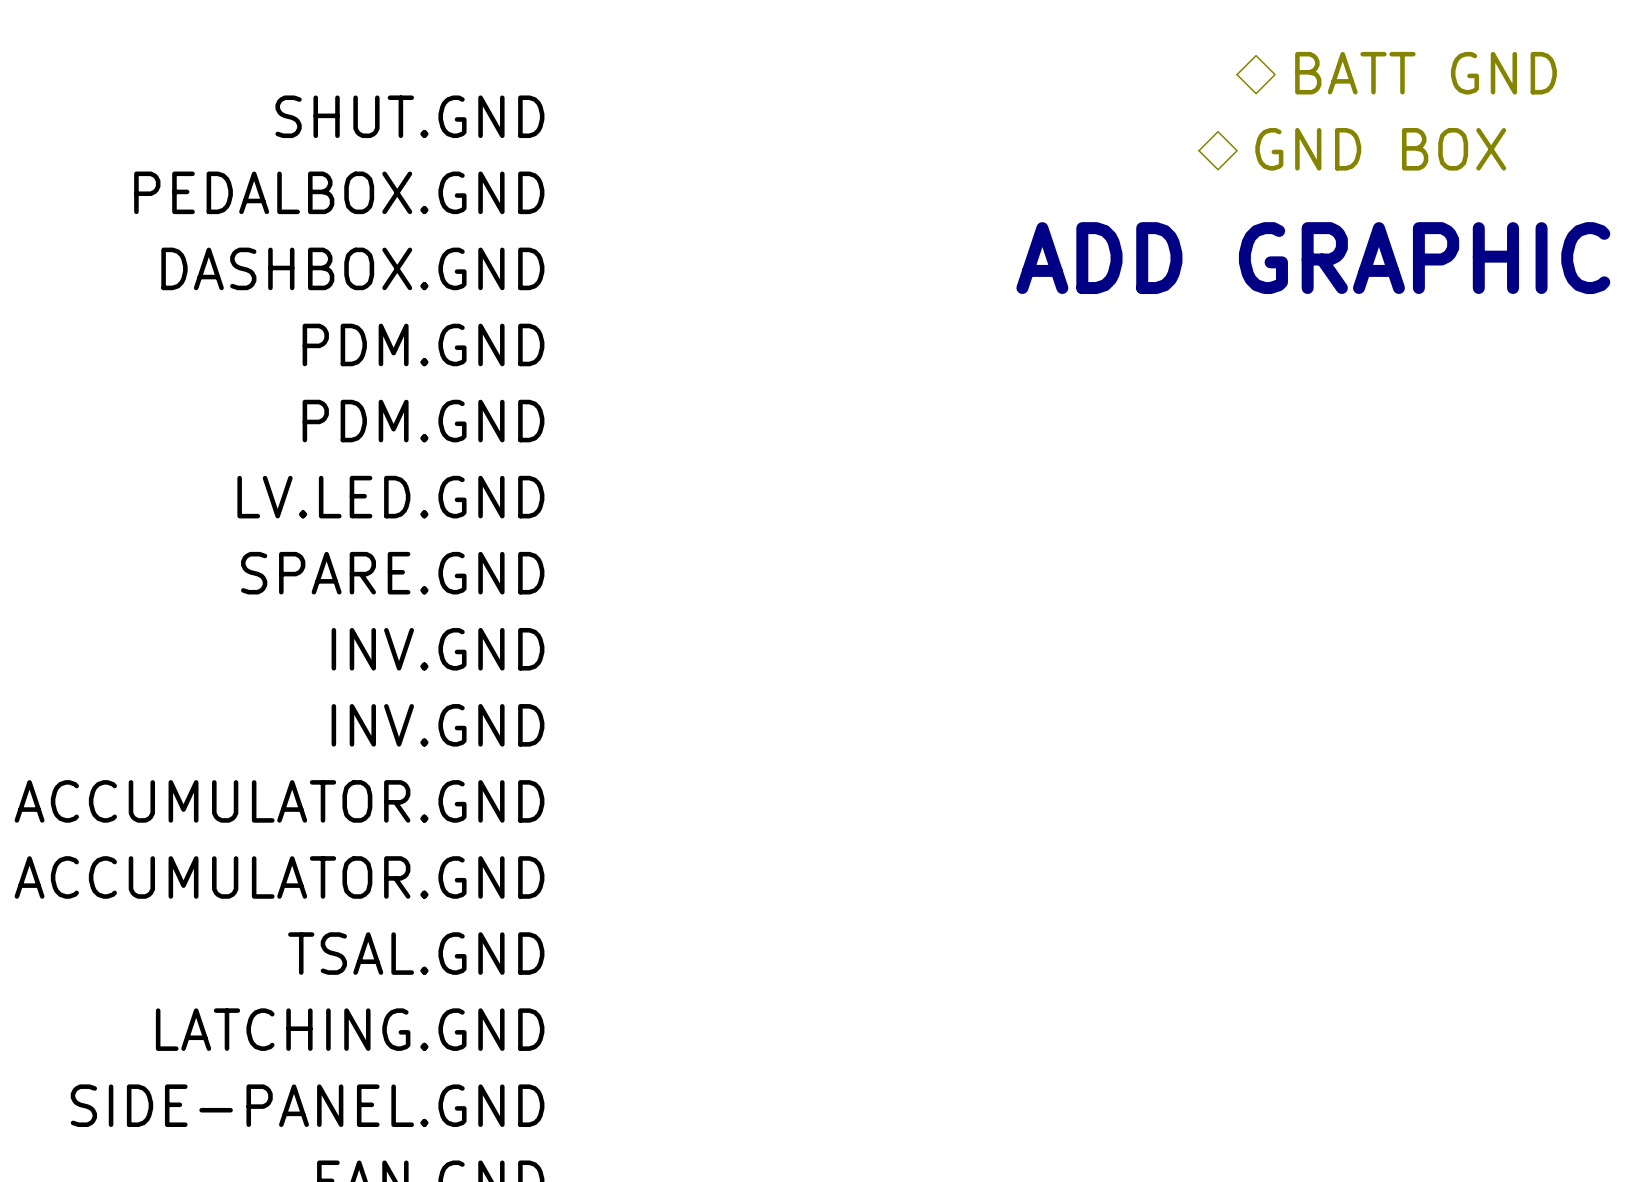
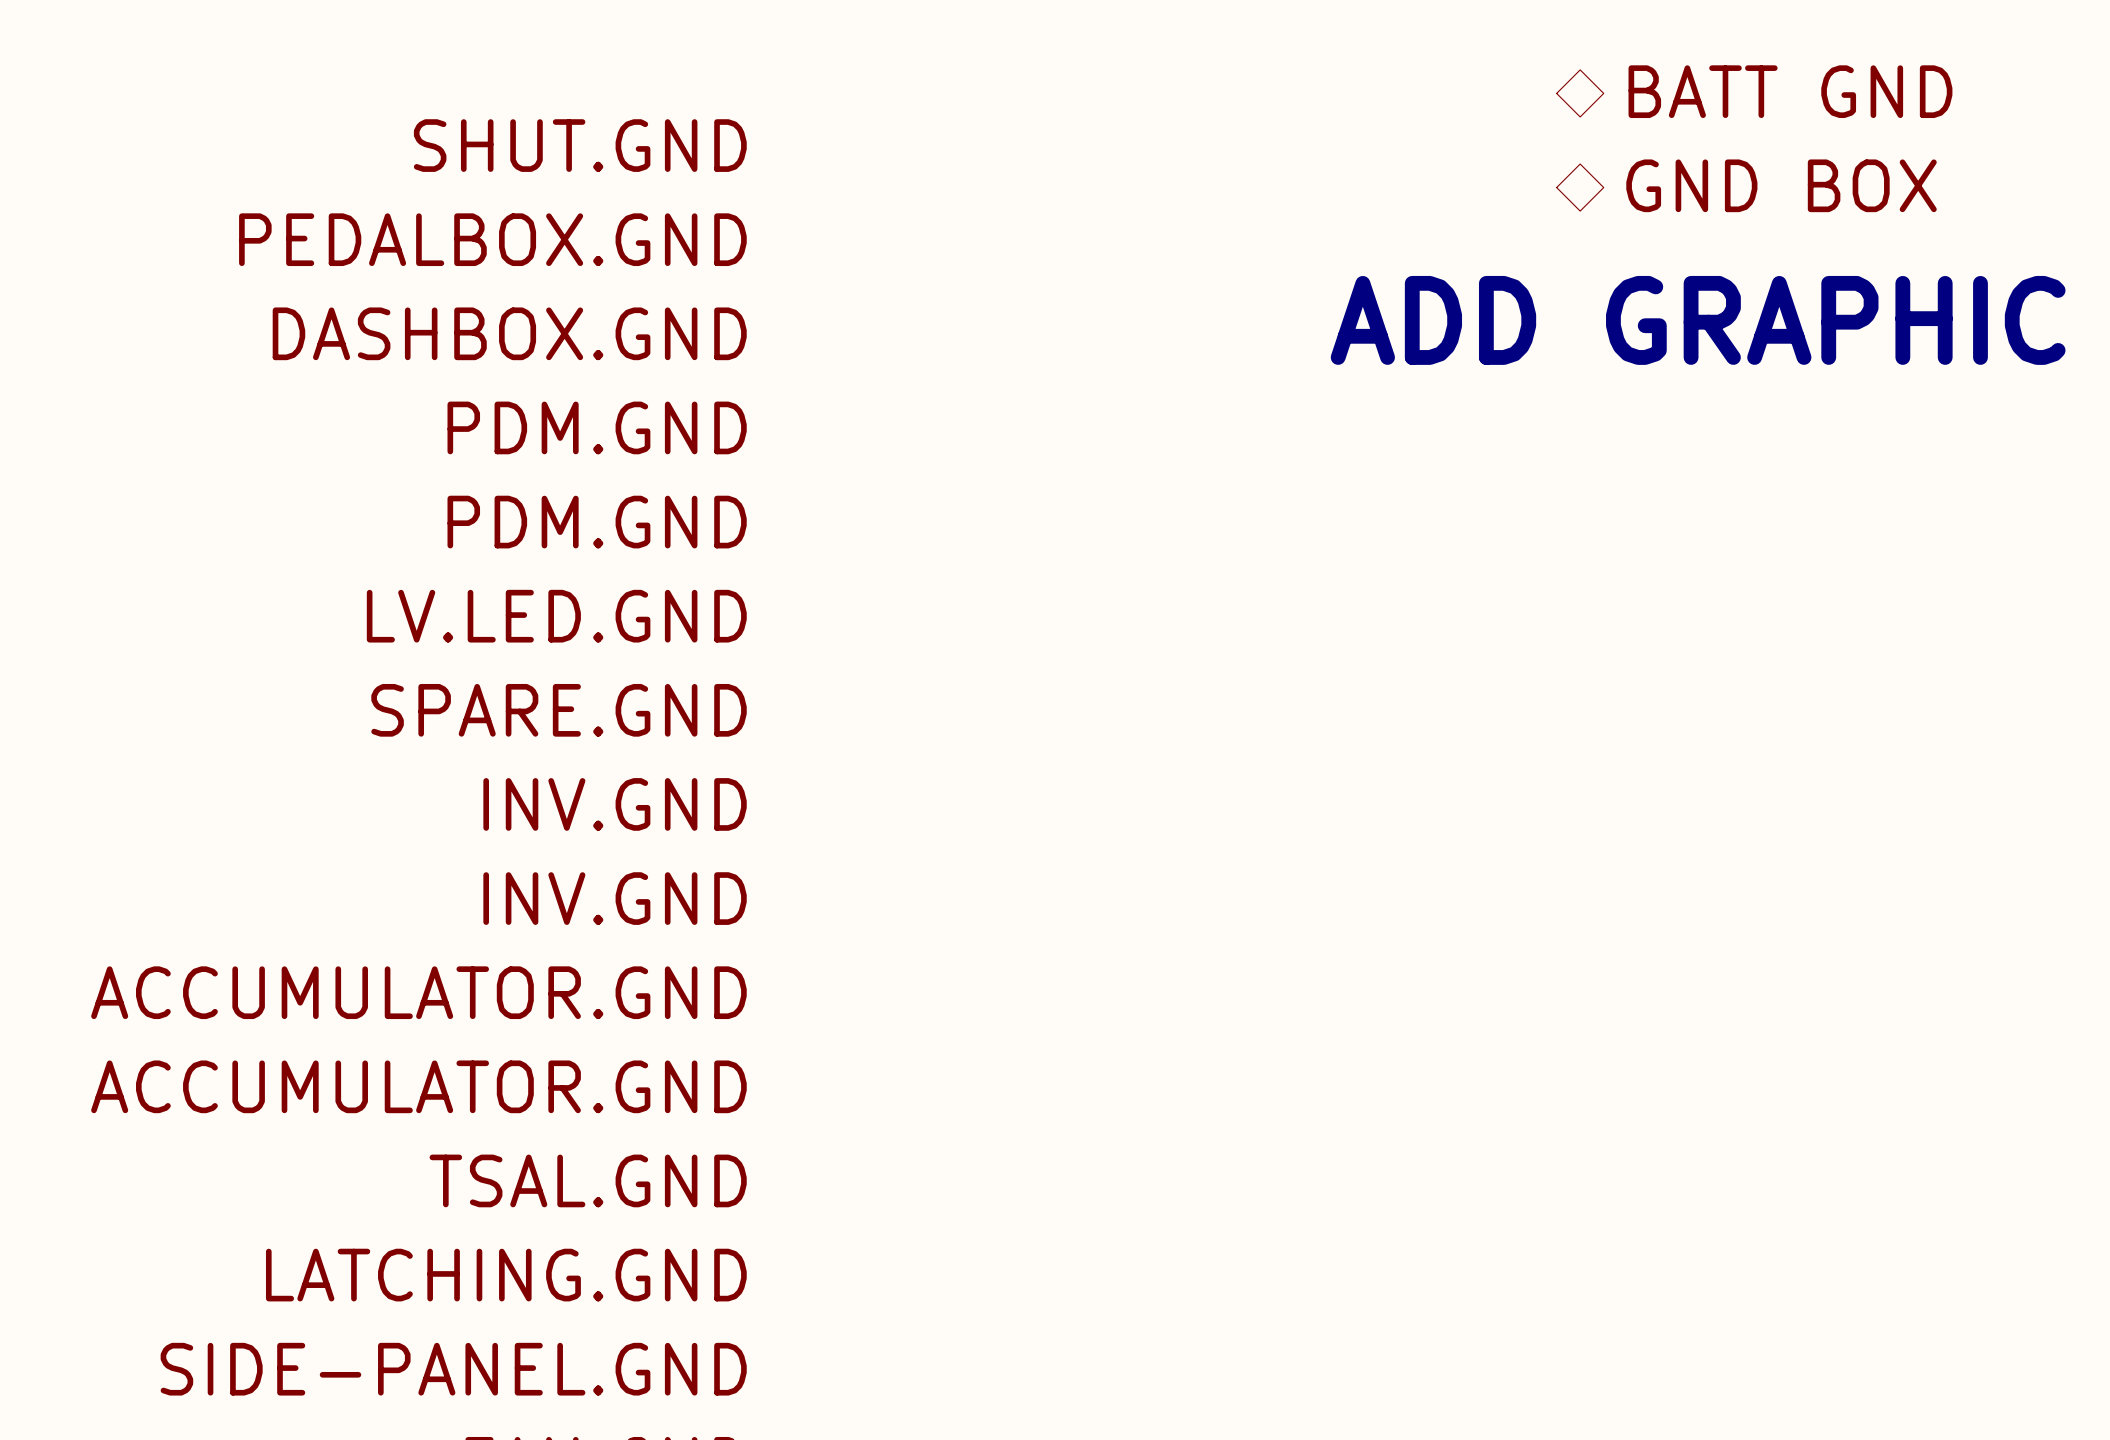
hierarchical label position: BATT GND (1426, 73) -> BATT GND (1790, 91)

